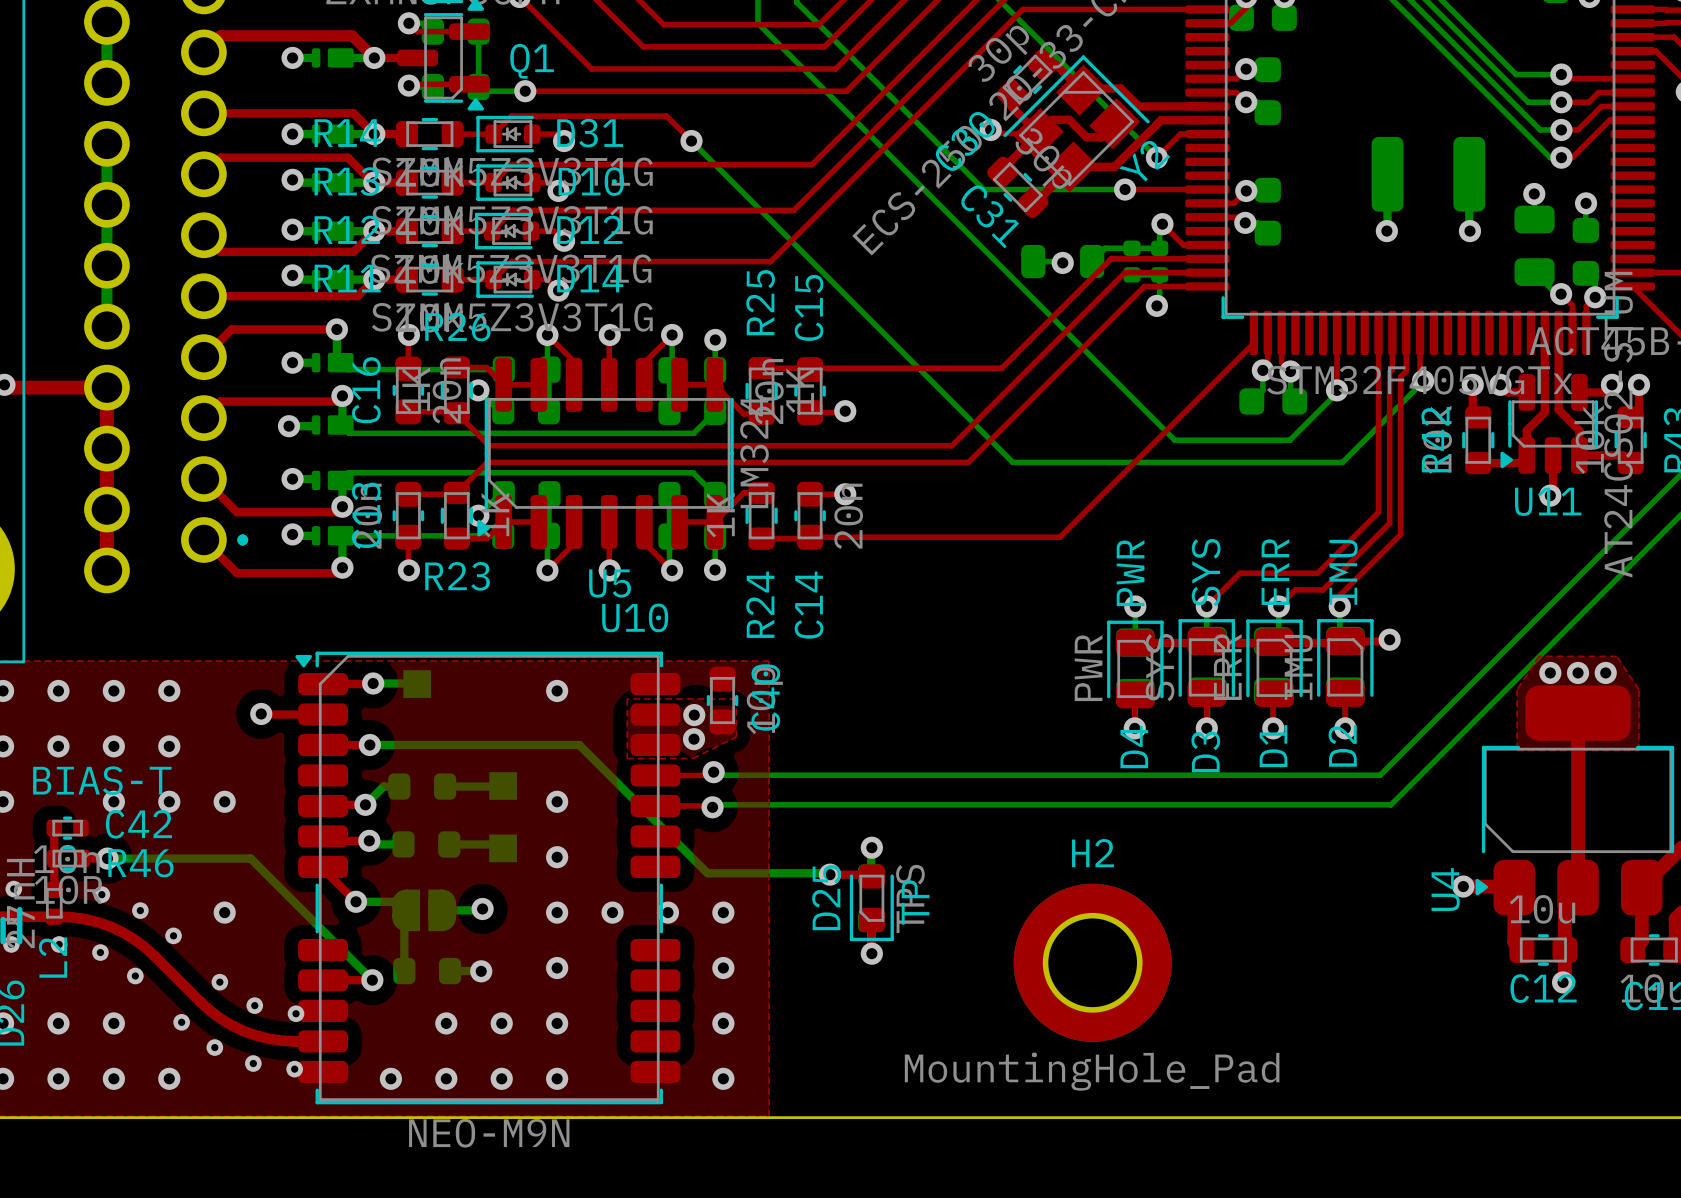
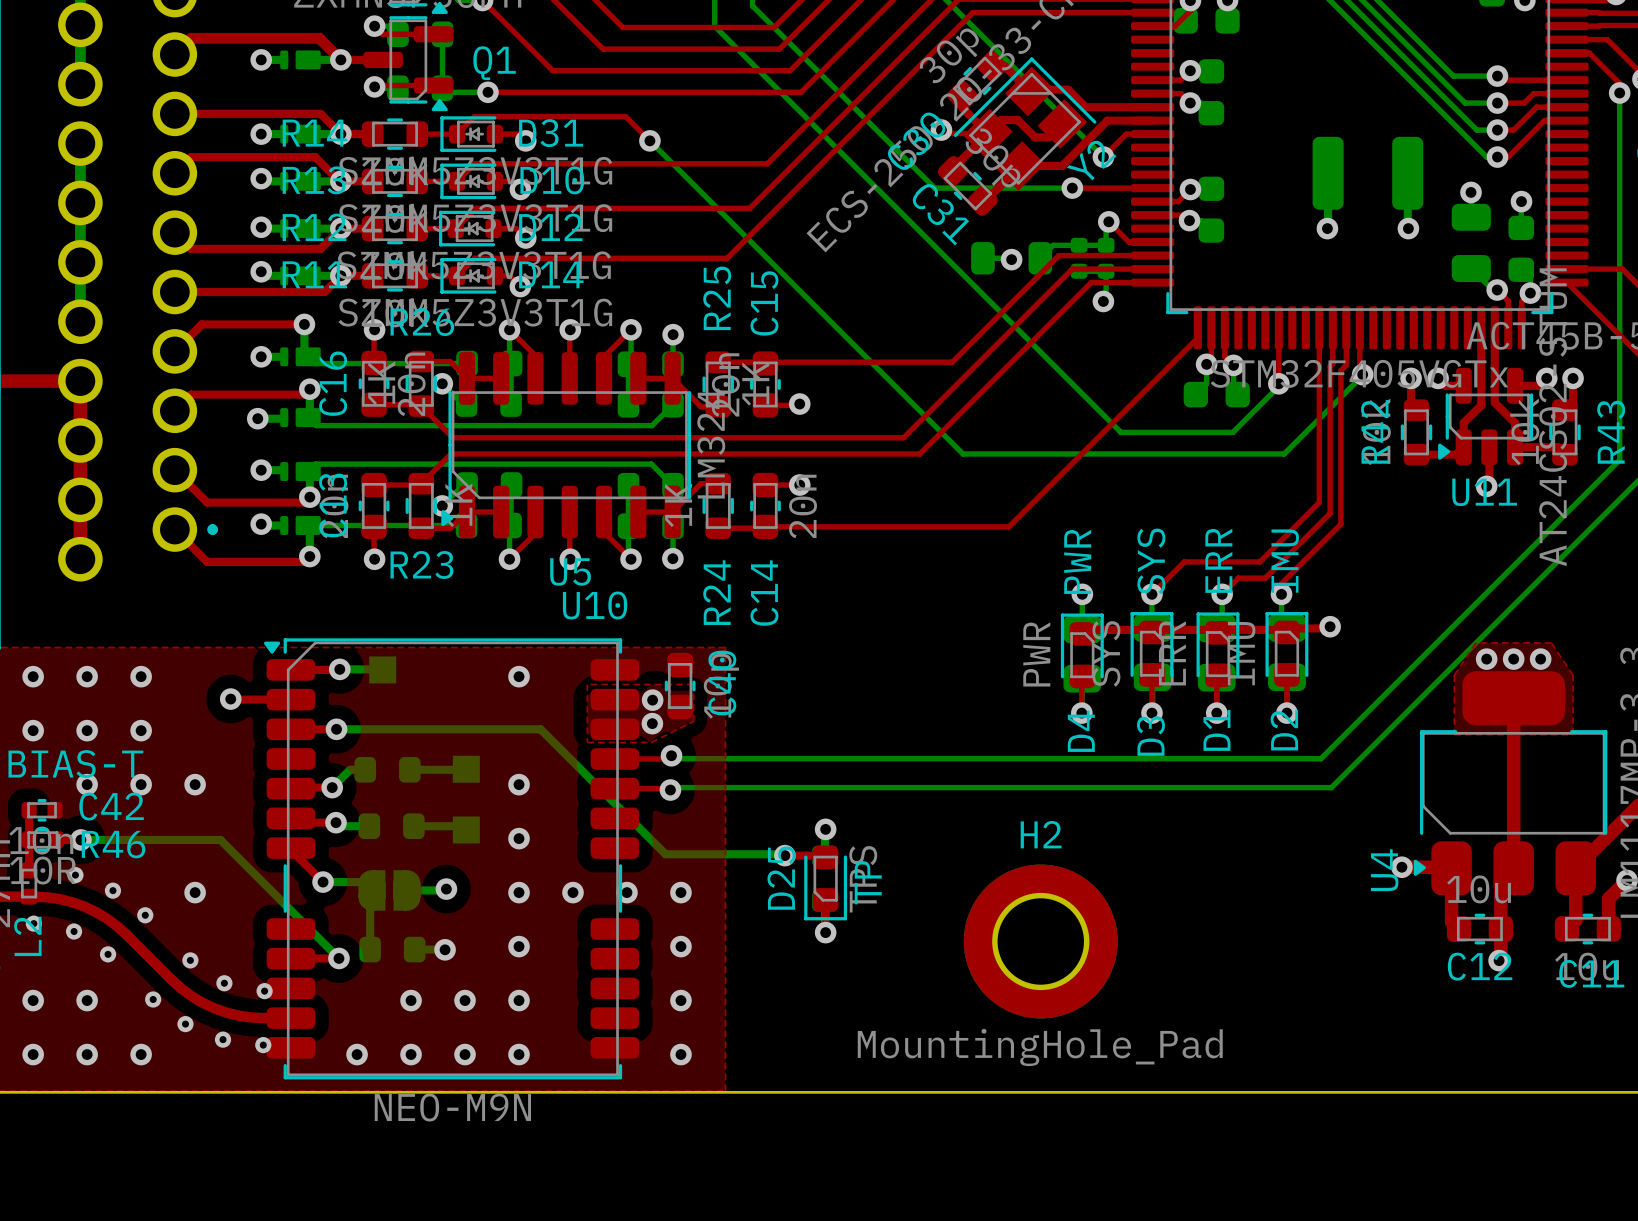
D3 footprint: [1178, 619, 1236, 707] -> [1130, 612, 1174, 687]
D1 footprint: [1246, 619, 1303, 708] -> [1196, 612, 1240, 688]
D2 footprint: [1317, 619, 1374, 707] -> [1265, 612, 1309, 687]
D4 footprint: [1107, 620, 1164, 709] -> [1060, 613, 1104, 689]

